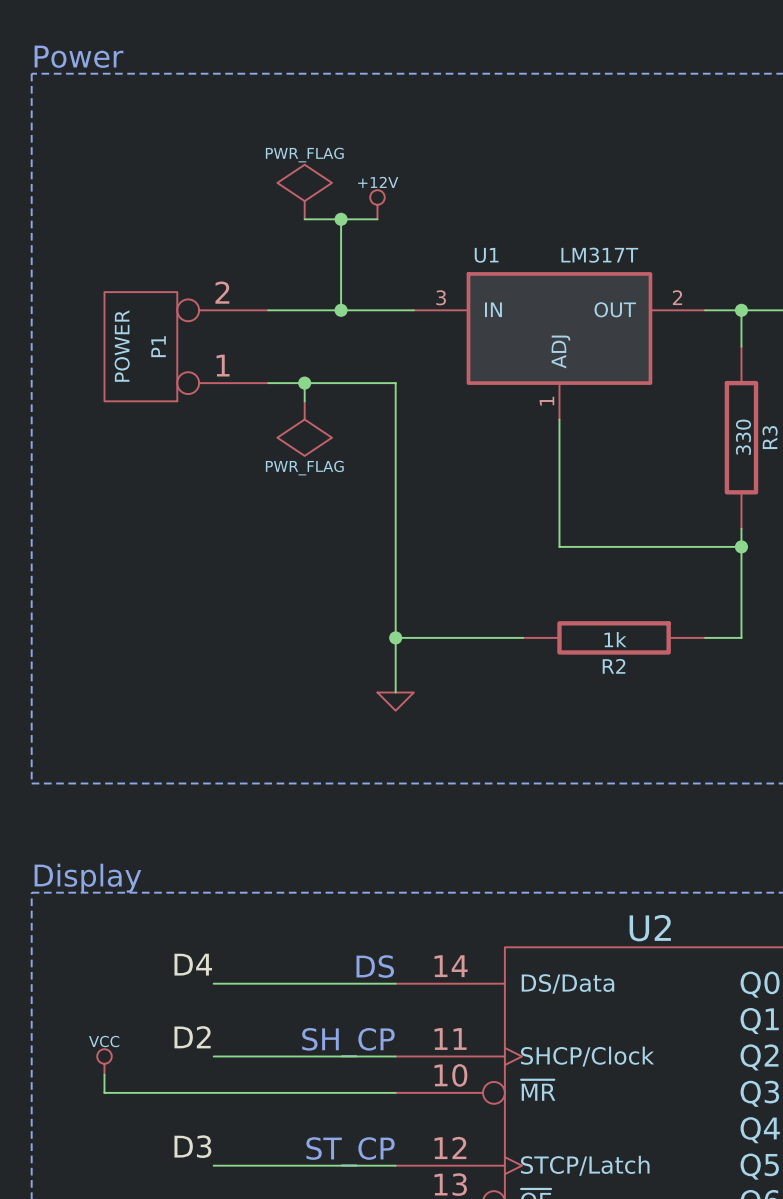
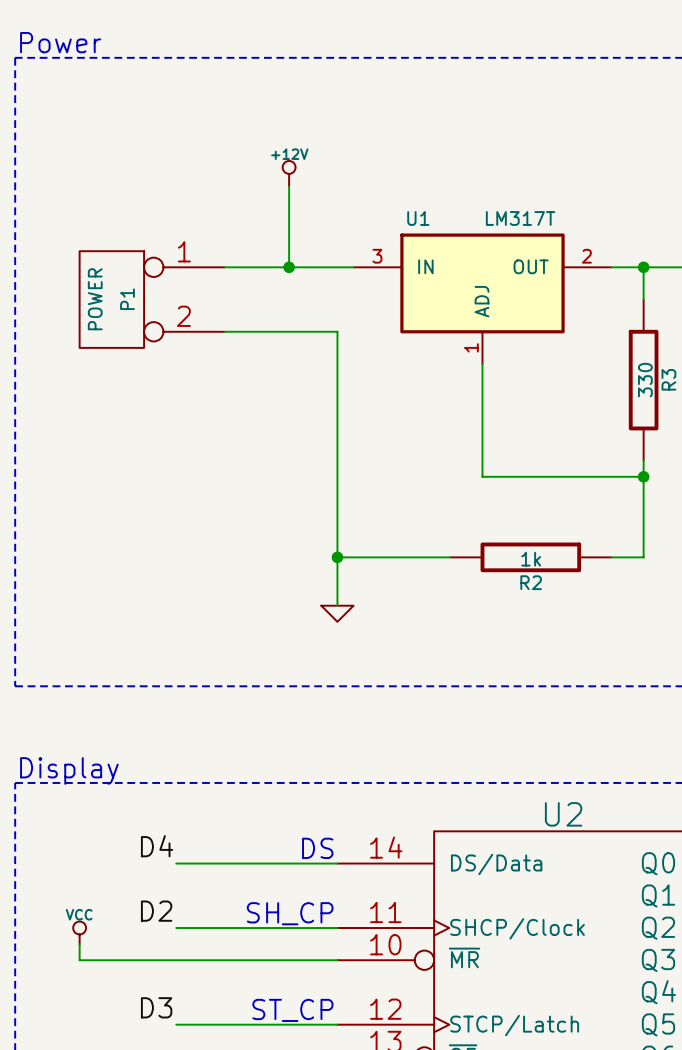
power symbol: PWR_FLAG (304, 192) -> none
power symbol position: +12V (377, 204) -> +12V (289, 173)
wire: (304, 219) (377, 219) -> none
junction: (341, 219) -> none
P1 flip: as is (140, 346) -> up-down (111, 299)
wire: (304, 383) (304, 401) -> none
junction: (304, 383) -> none
power symbol: PWR_FLAG (304, 428) -> none

